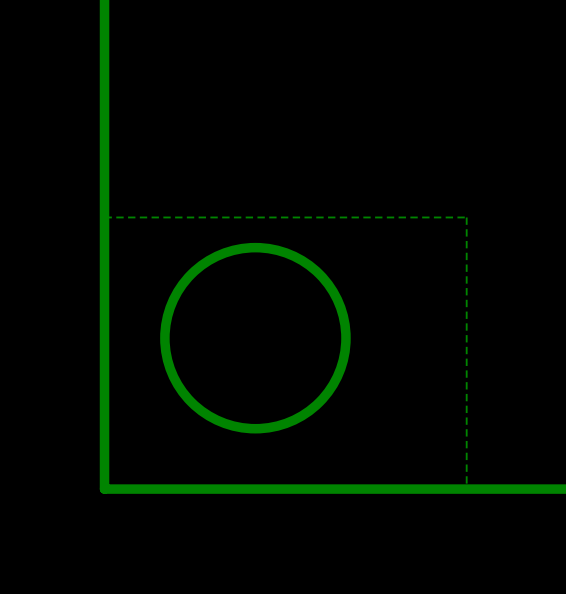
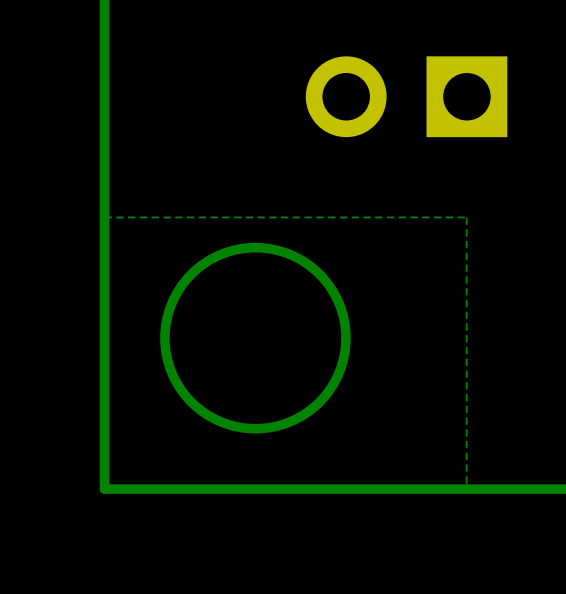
part: none -> (406, 96)

